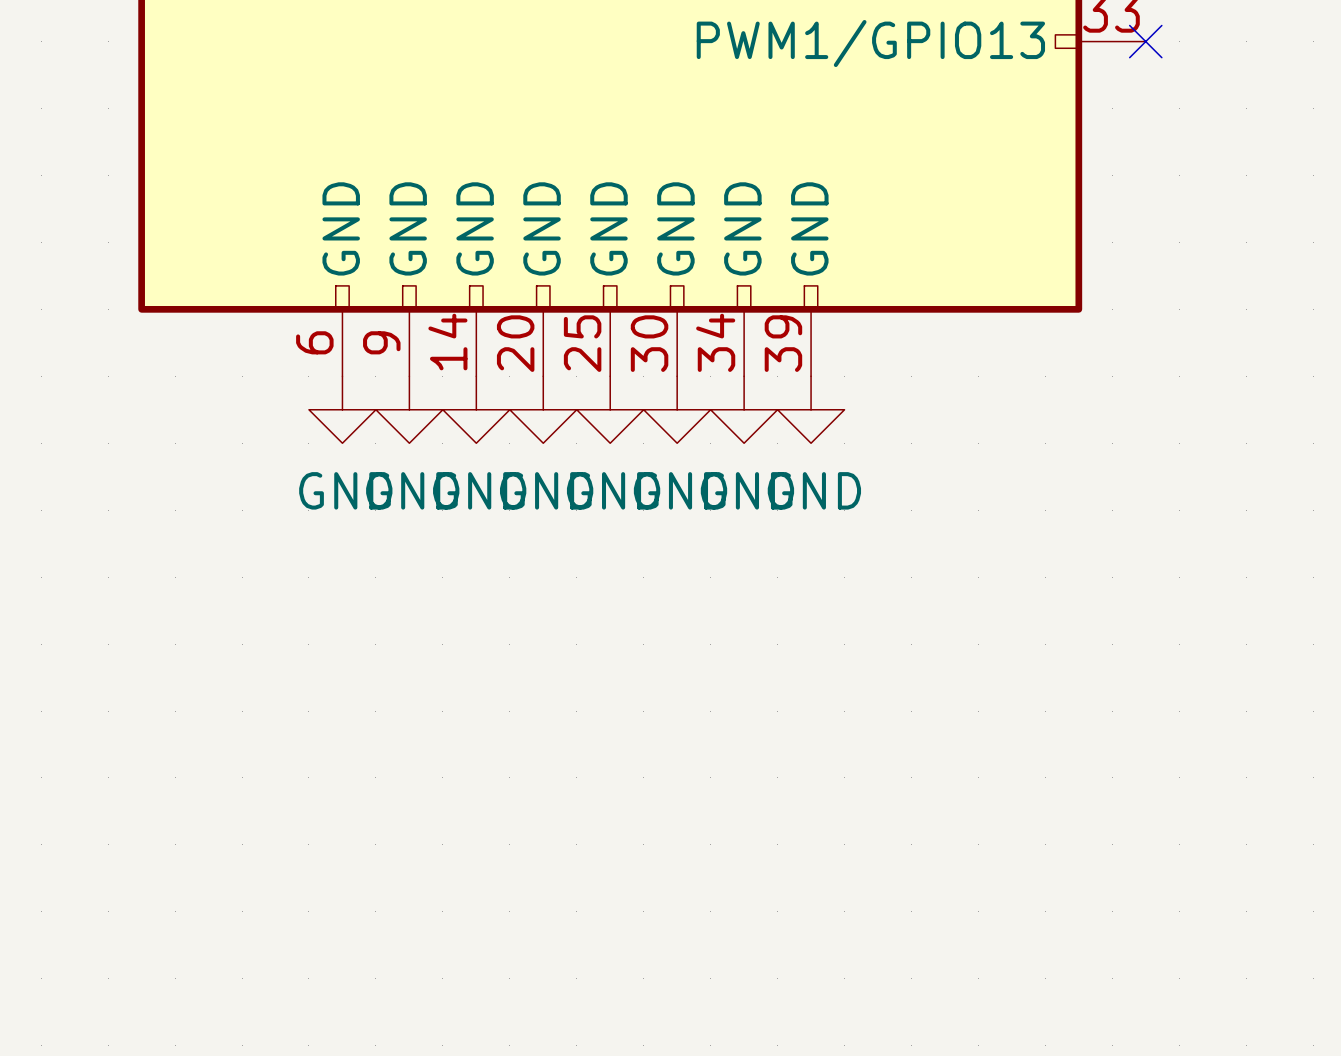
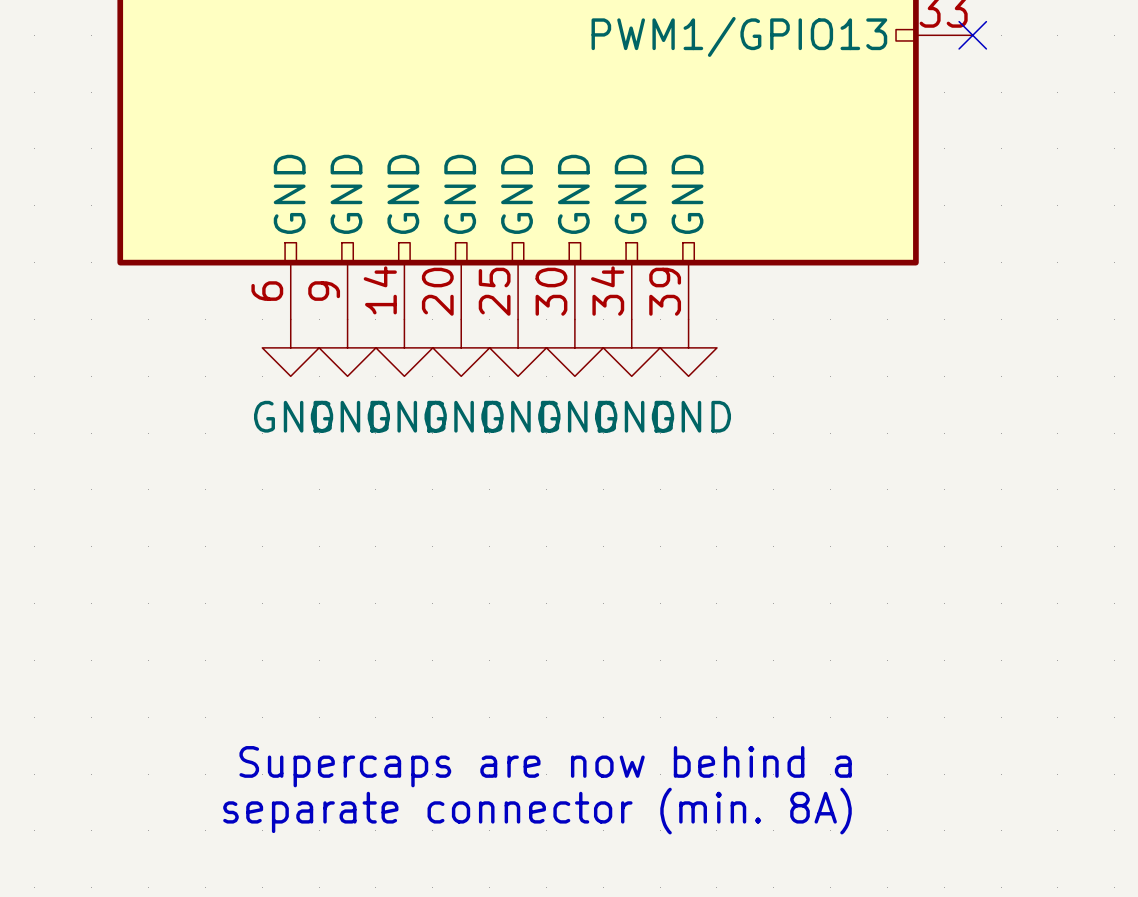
text: none -> Supercaps are now behind a (545, 766)
text: none -> separate connector (min. 8A) (537, 811)

